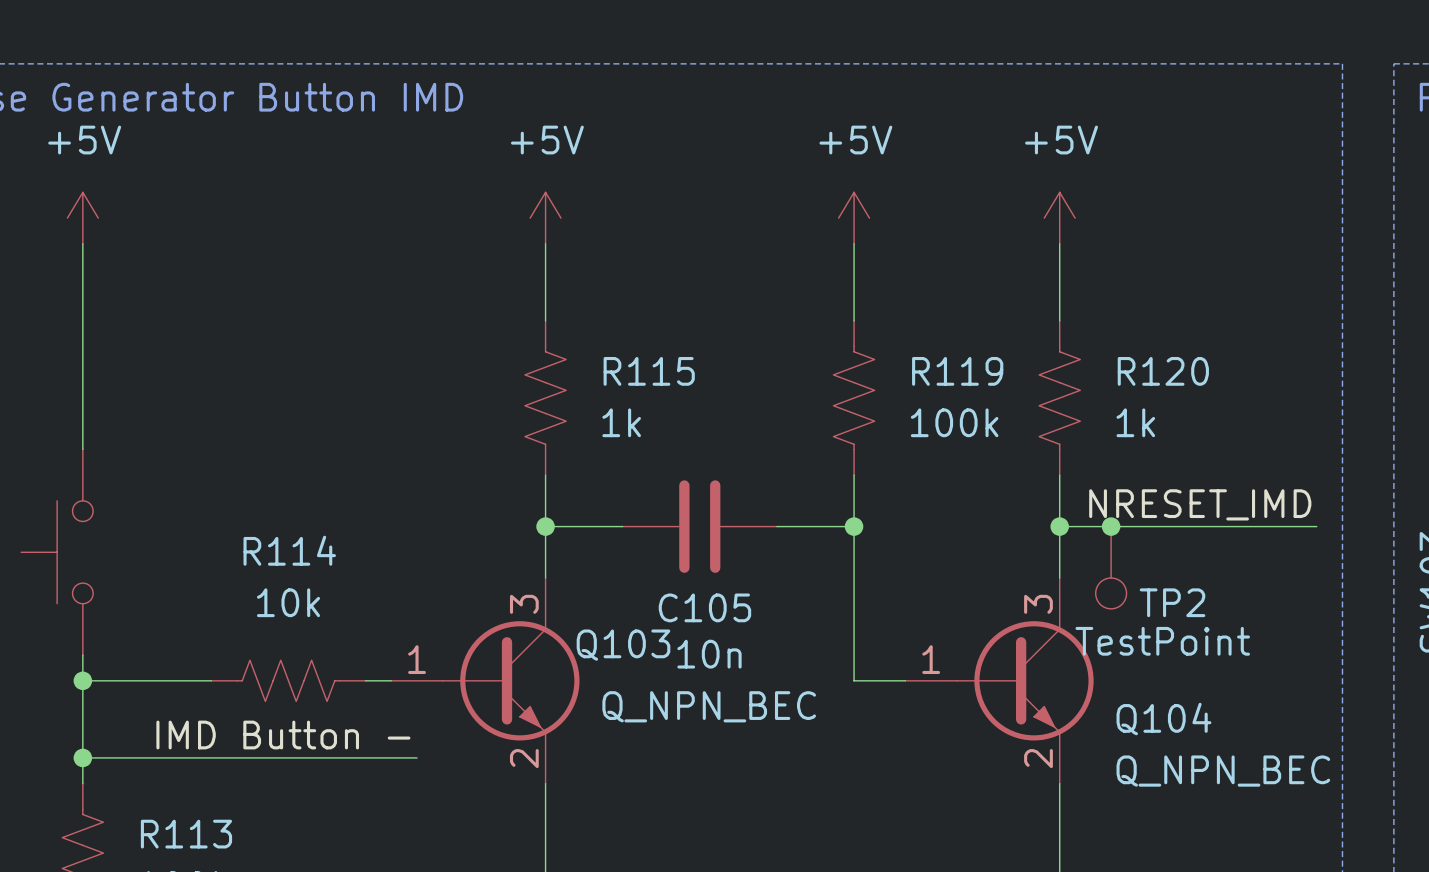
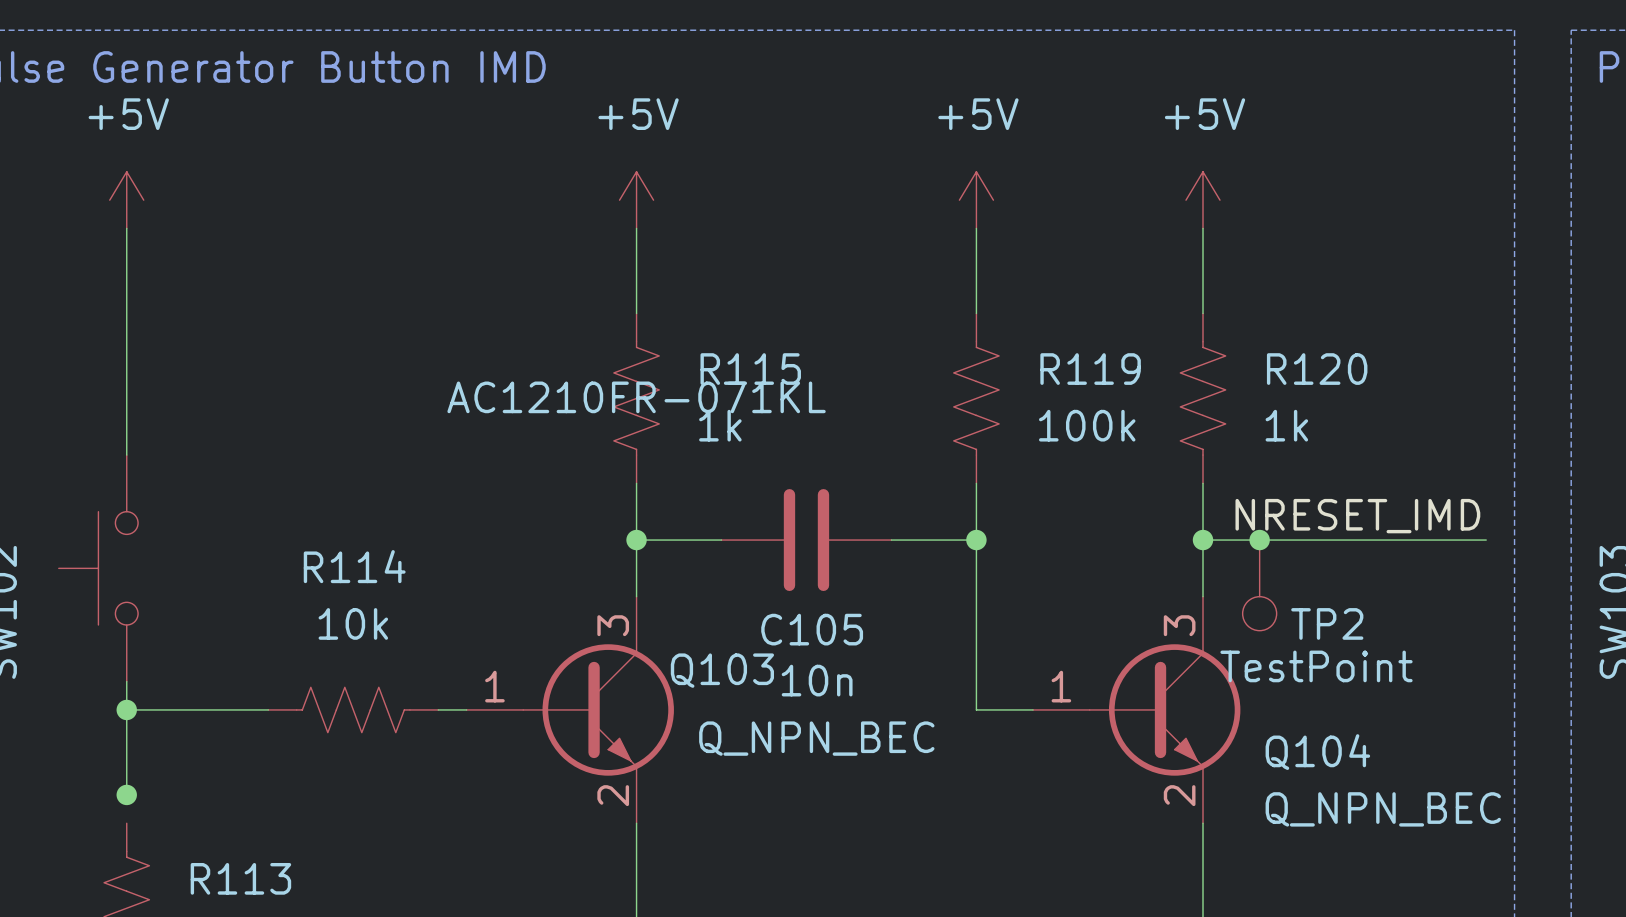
R115 text: none -> AC1210FR-071KL (636, 397)
label: IMD Button - (283, 735) -> none
wire: (417, 757) (82, 757) (82, 783) -> none

